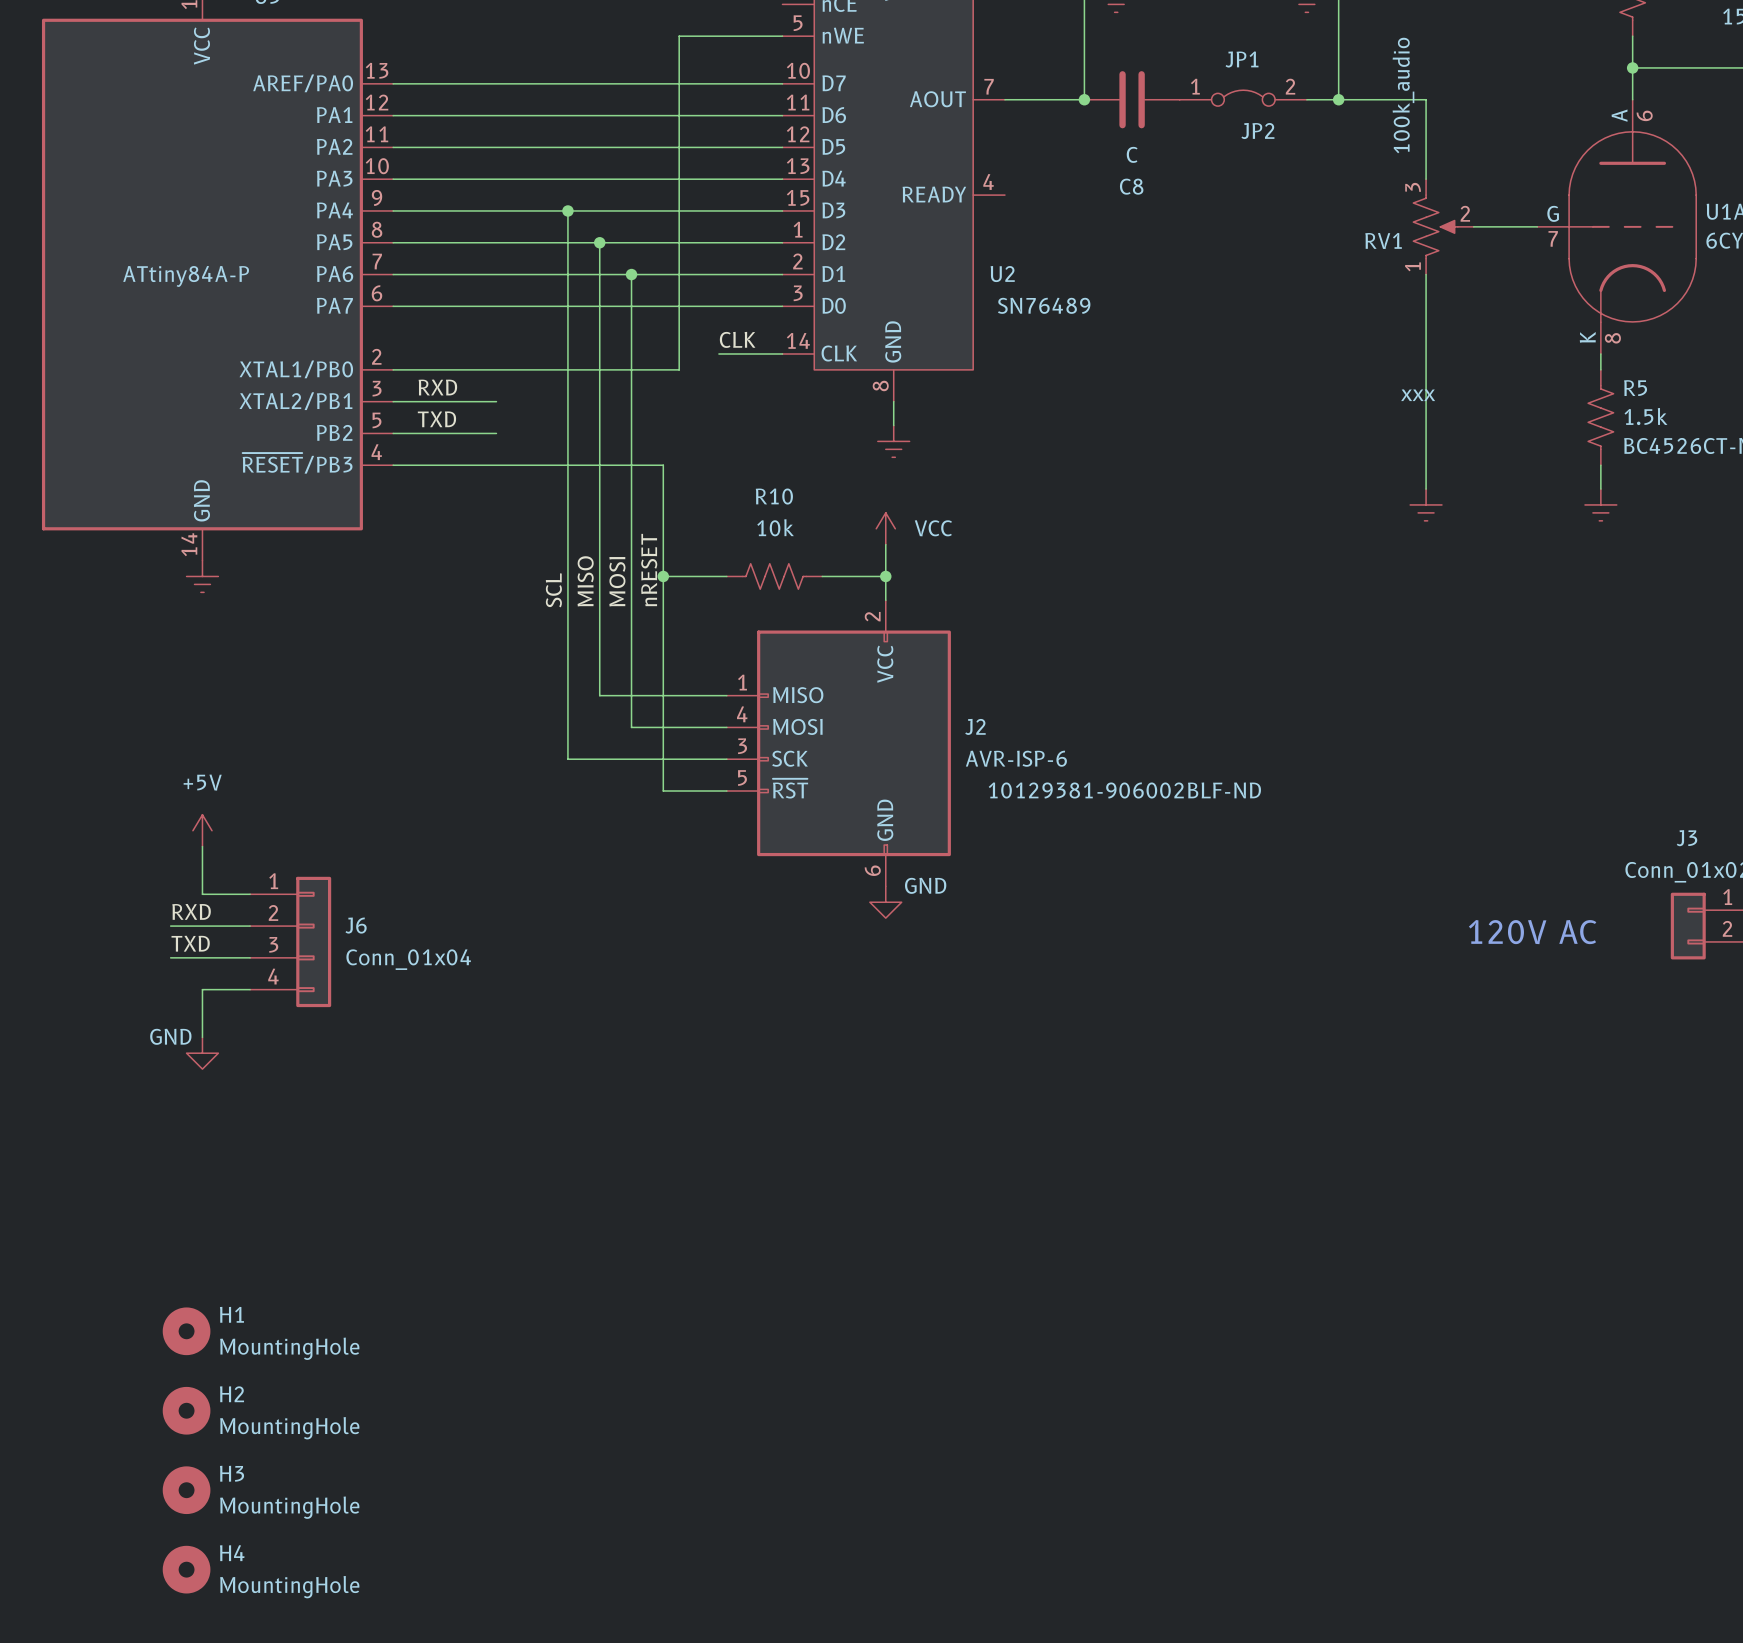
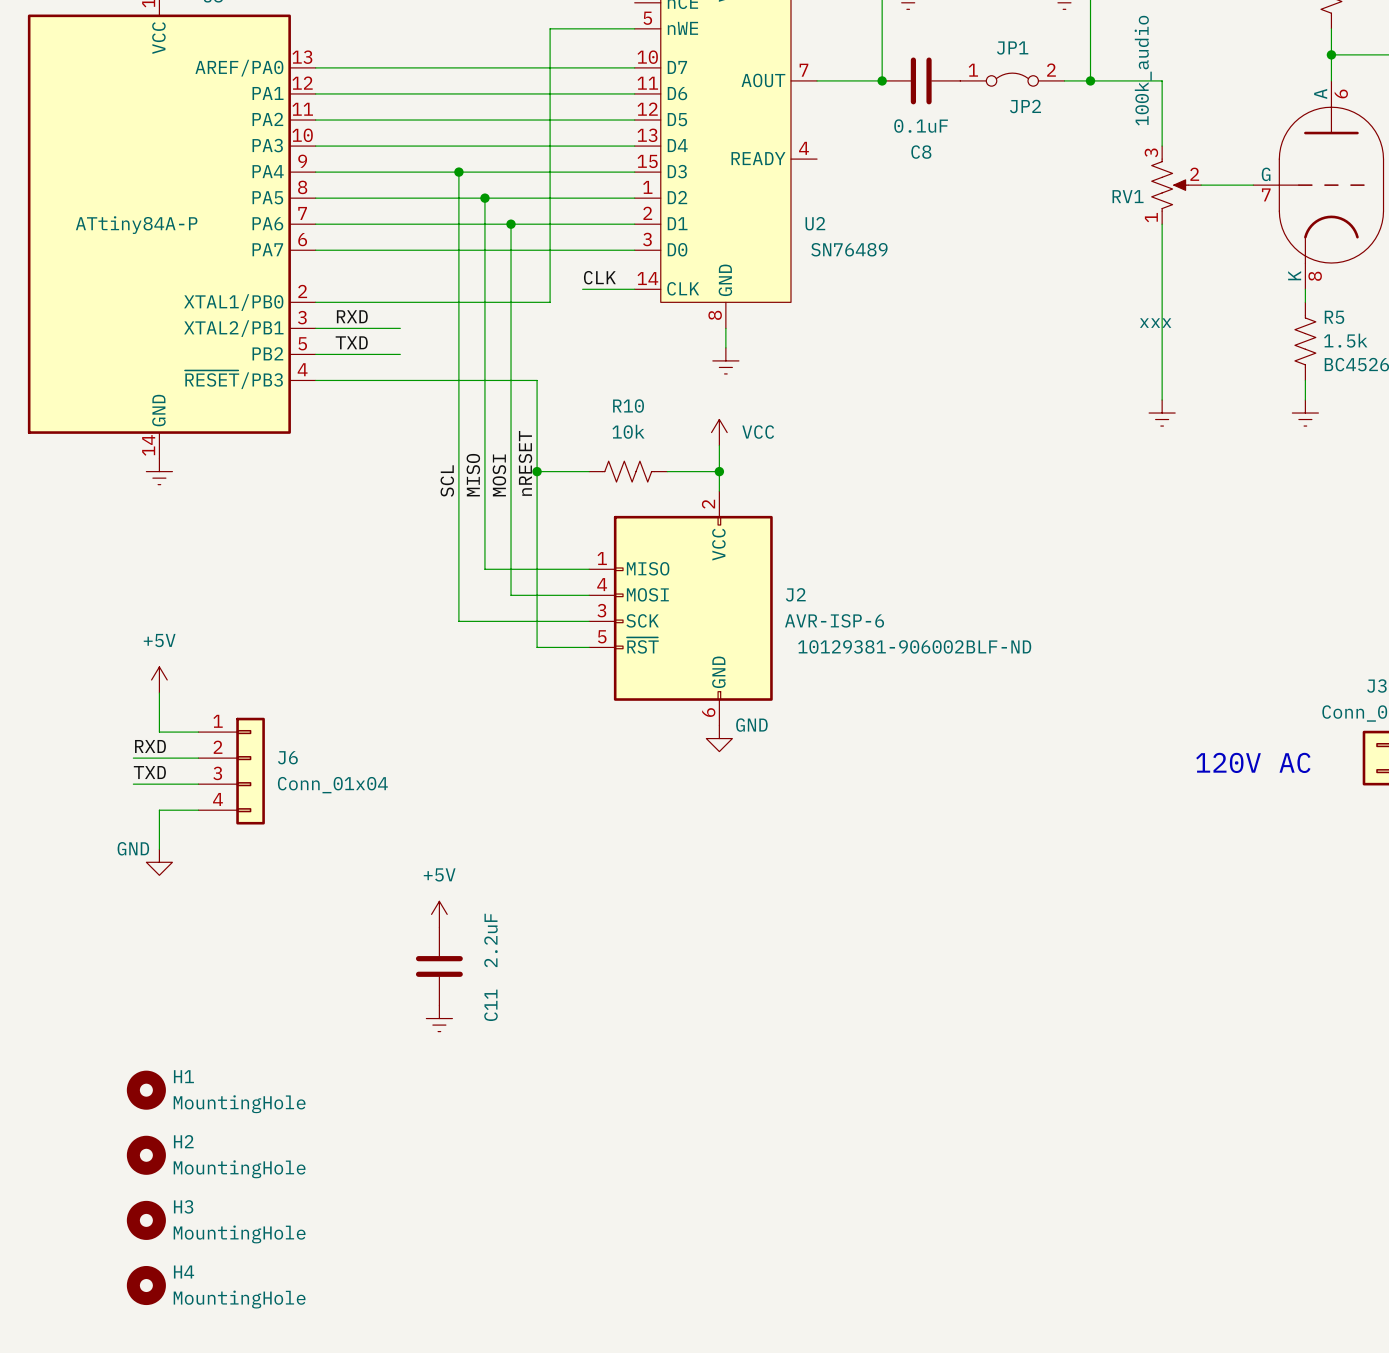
C8 value: C (1132, 154) -> 0.1uF (921, 126)
power symbol: none -> +5V (439, 914)
C11: none -> 2.2uF (439, 966)
power symbol: none -> (439, 1018)

